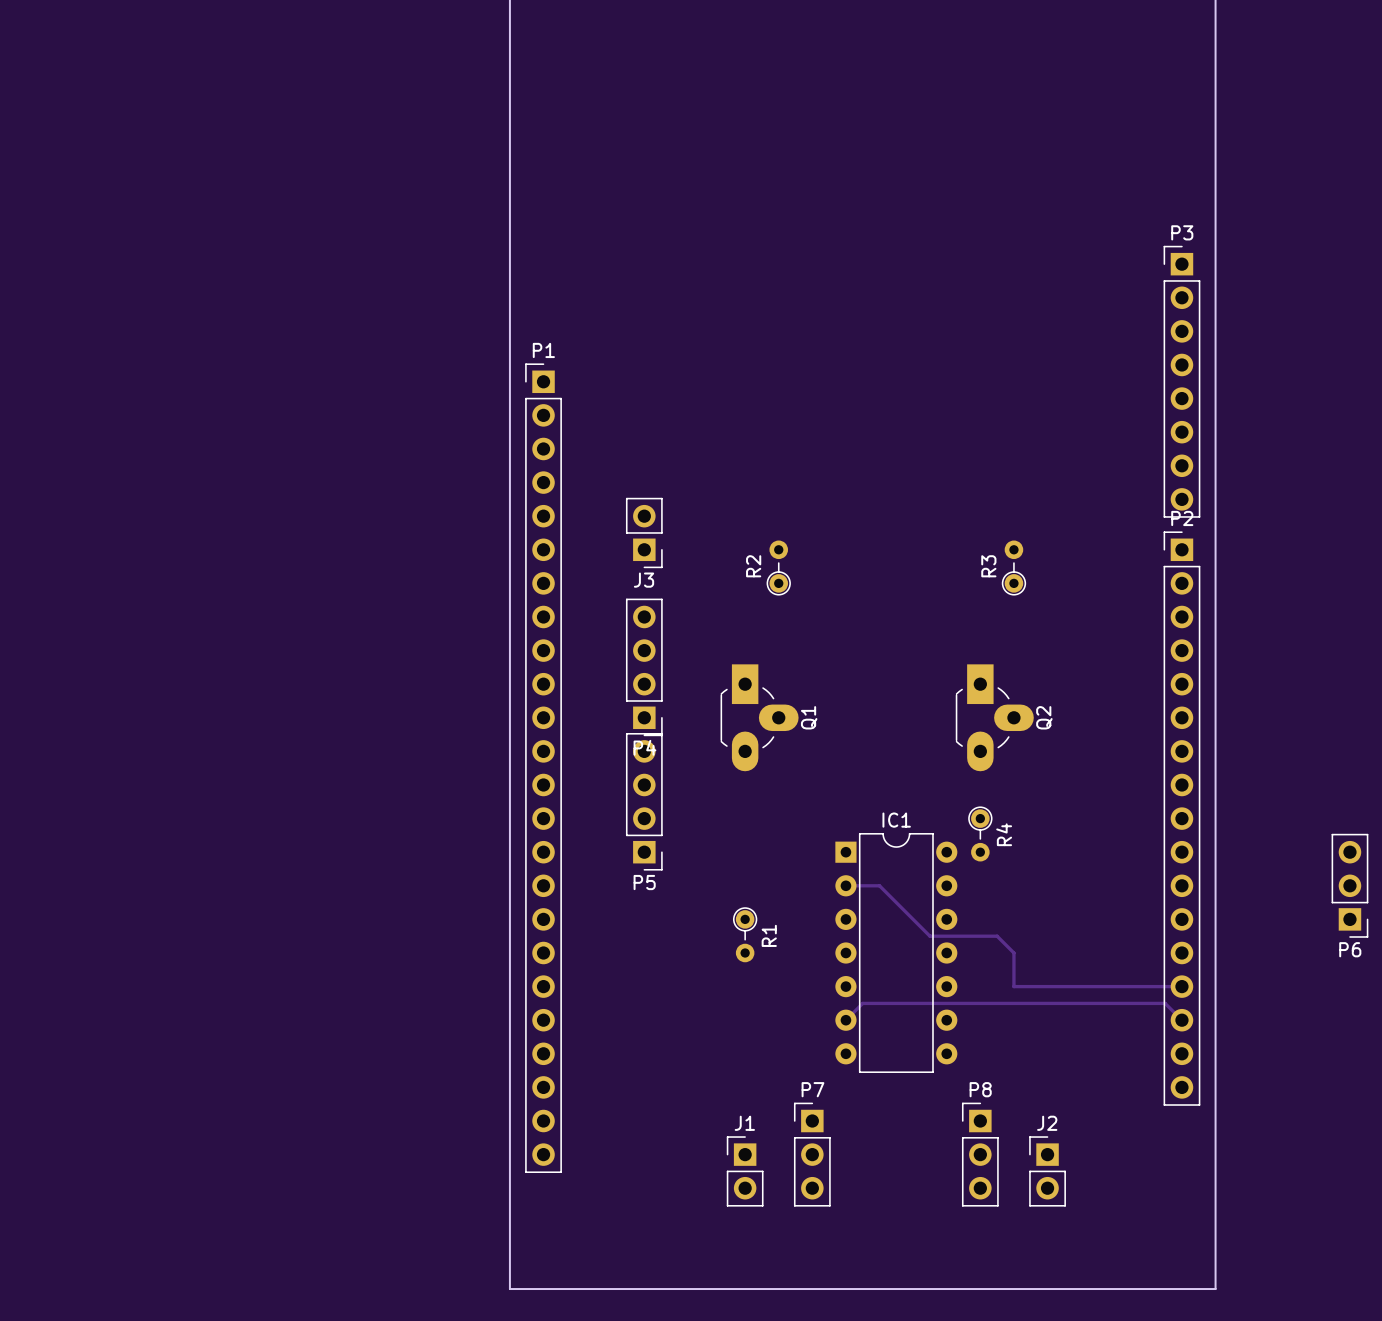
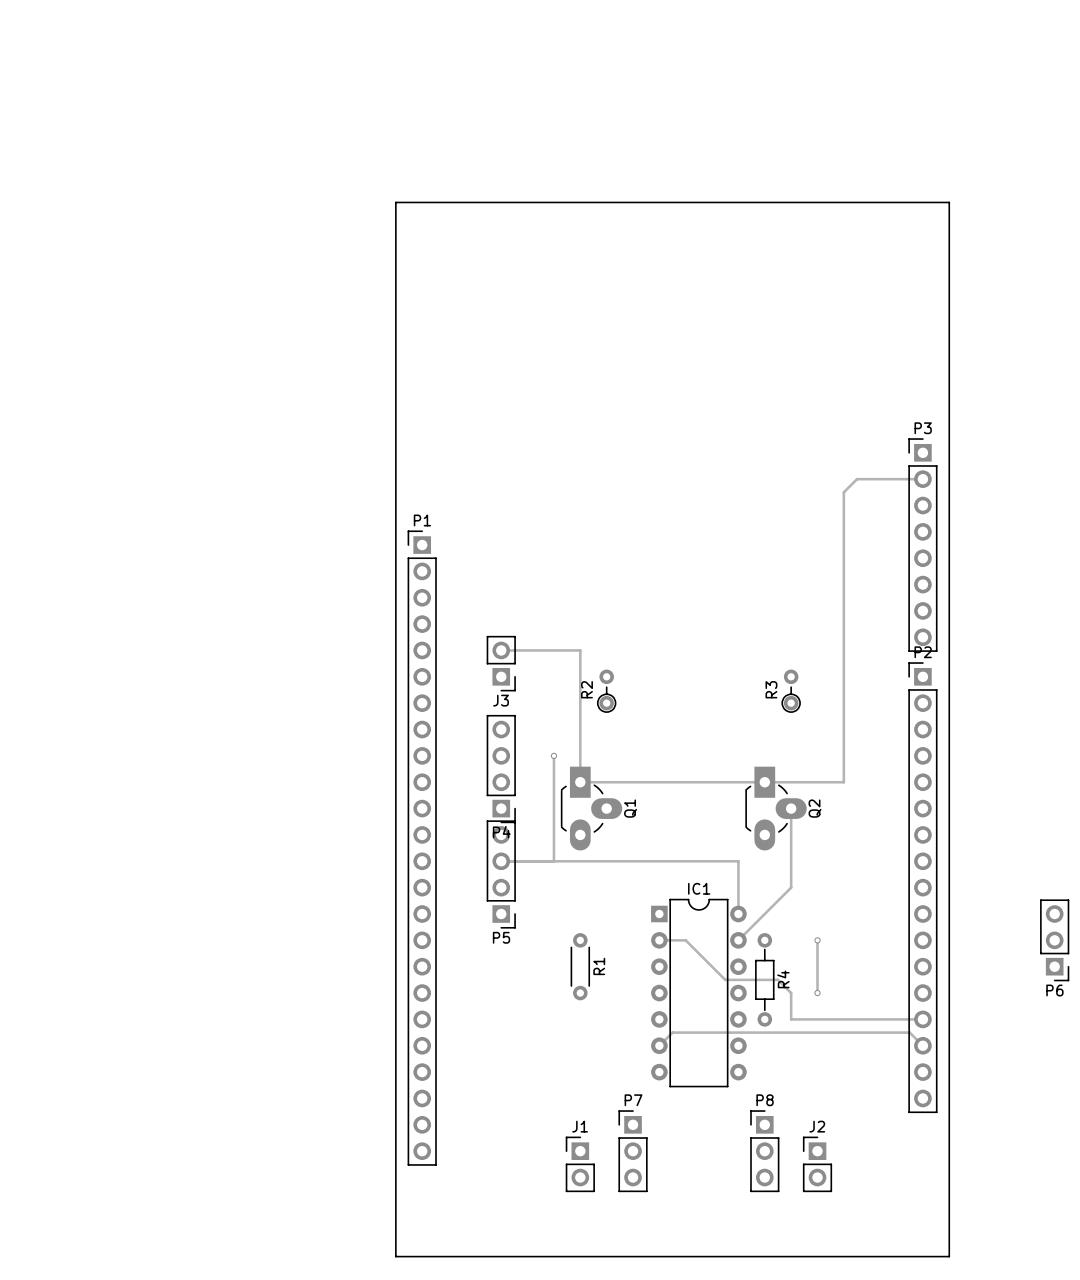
track: none -> (922, 479) (857, 479) (843, 492) (843, 782) (580, 782) (580, 650) (501, 650)
track: none -> (553, 755) (553, 861)
via: none -> (553, 755)
track: none -> (791, 808) (791, 887) (738, 940)
track: none -> (501, 861) (738, 861) (738, 914)
R4 footprint: [968, 806, 993, 862] -> [755, 933, 775, 1027]
track: none -> (817, 940) (817, 993)
via: none -> (817, 940)
R1 footprint: [732, 907, 758, 963] -> [570, 933, 590, 1001]
via: none -> (817, 993)

